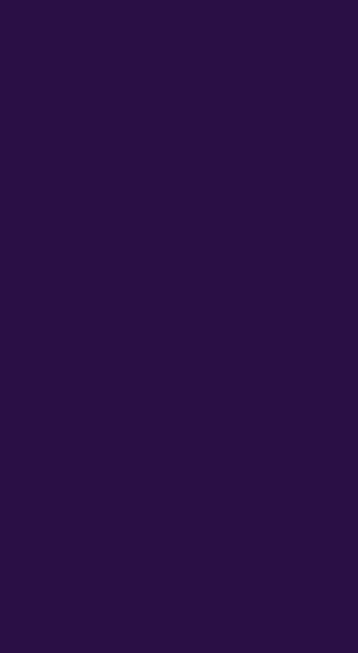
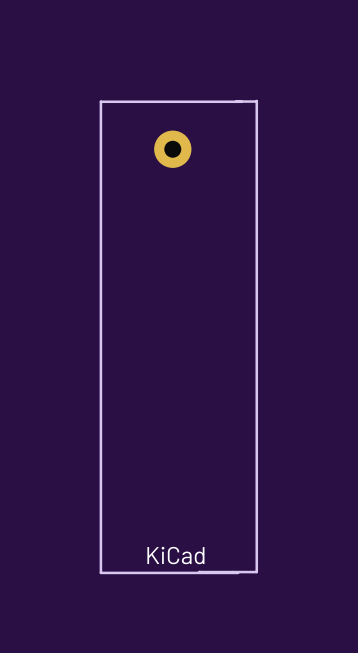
board edge: none -> (256, 100) (256, 572)
board edge: none -> (241, 101) (100, 101) (100, 572) (238, 572)
board edge: none -> (256, 101) (236, 101)
part: none -> (172, 149)
text: none -> KiCad (175, 555)
board edge: none -> (256, 572) (199, 572)

